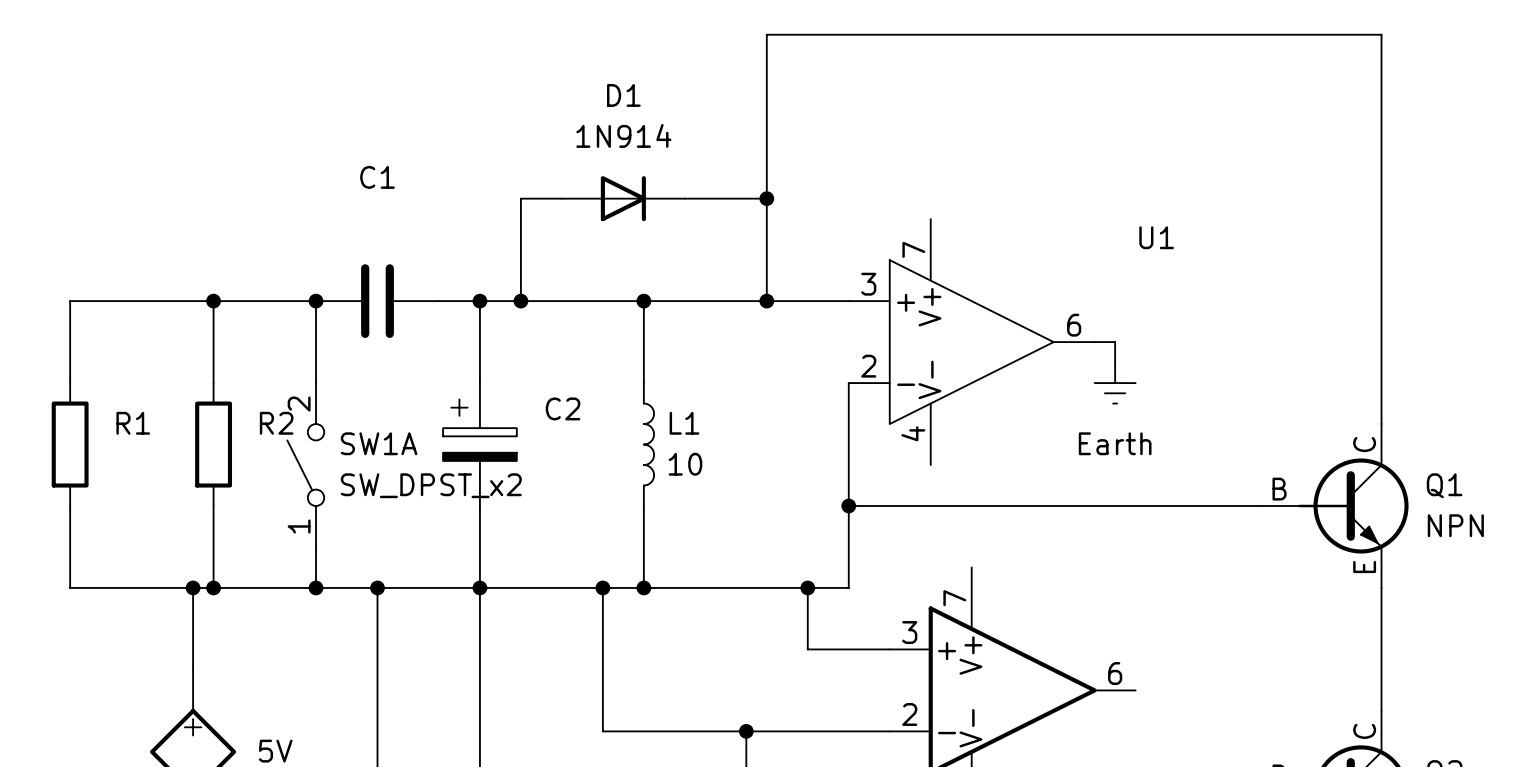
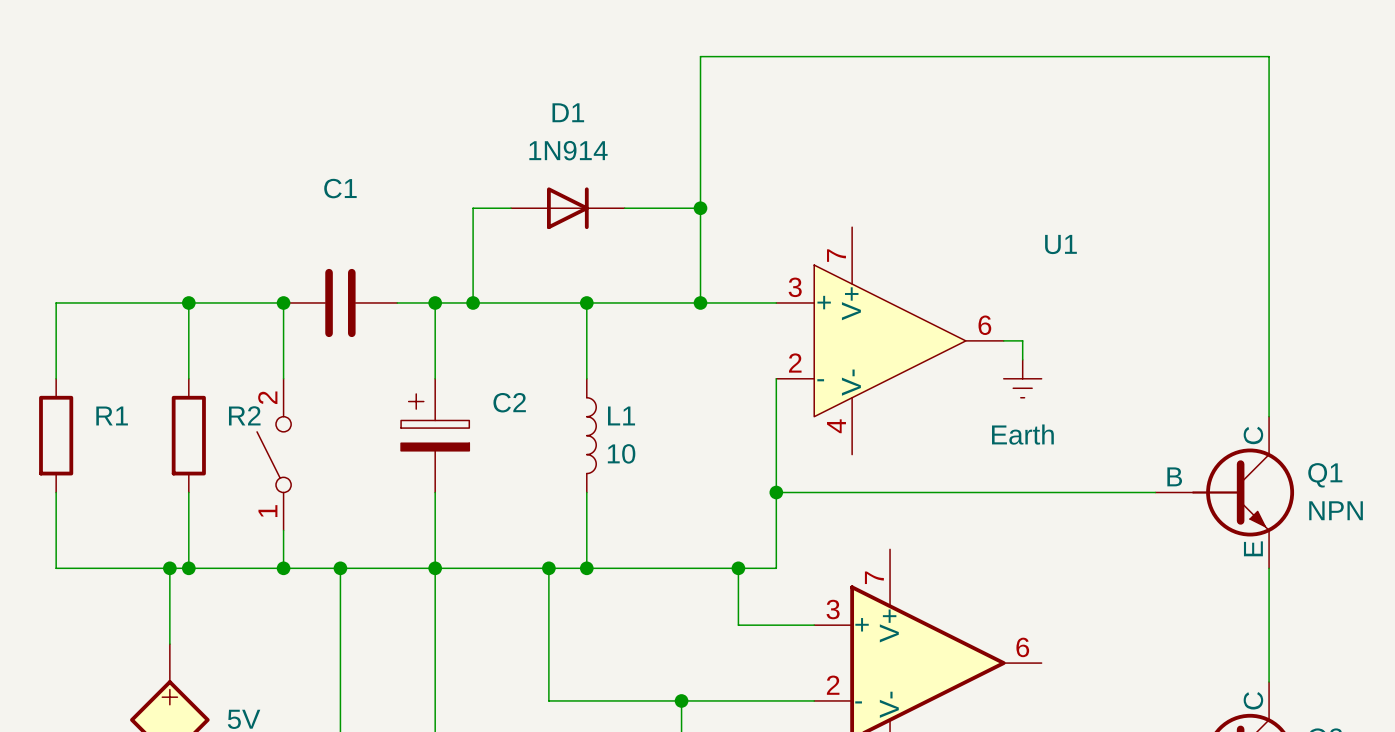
SW1A name: SW1A (379, 443) -> none
SW1A value: SW_DPST_x2 (431, 485) -> none

